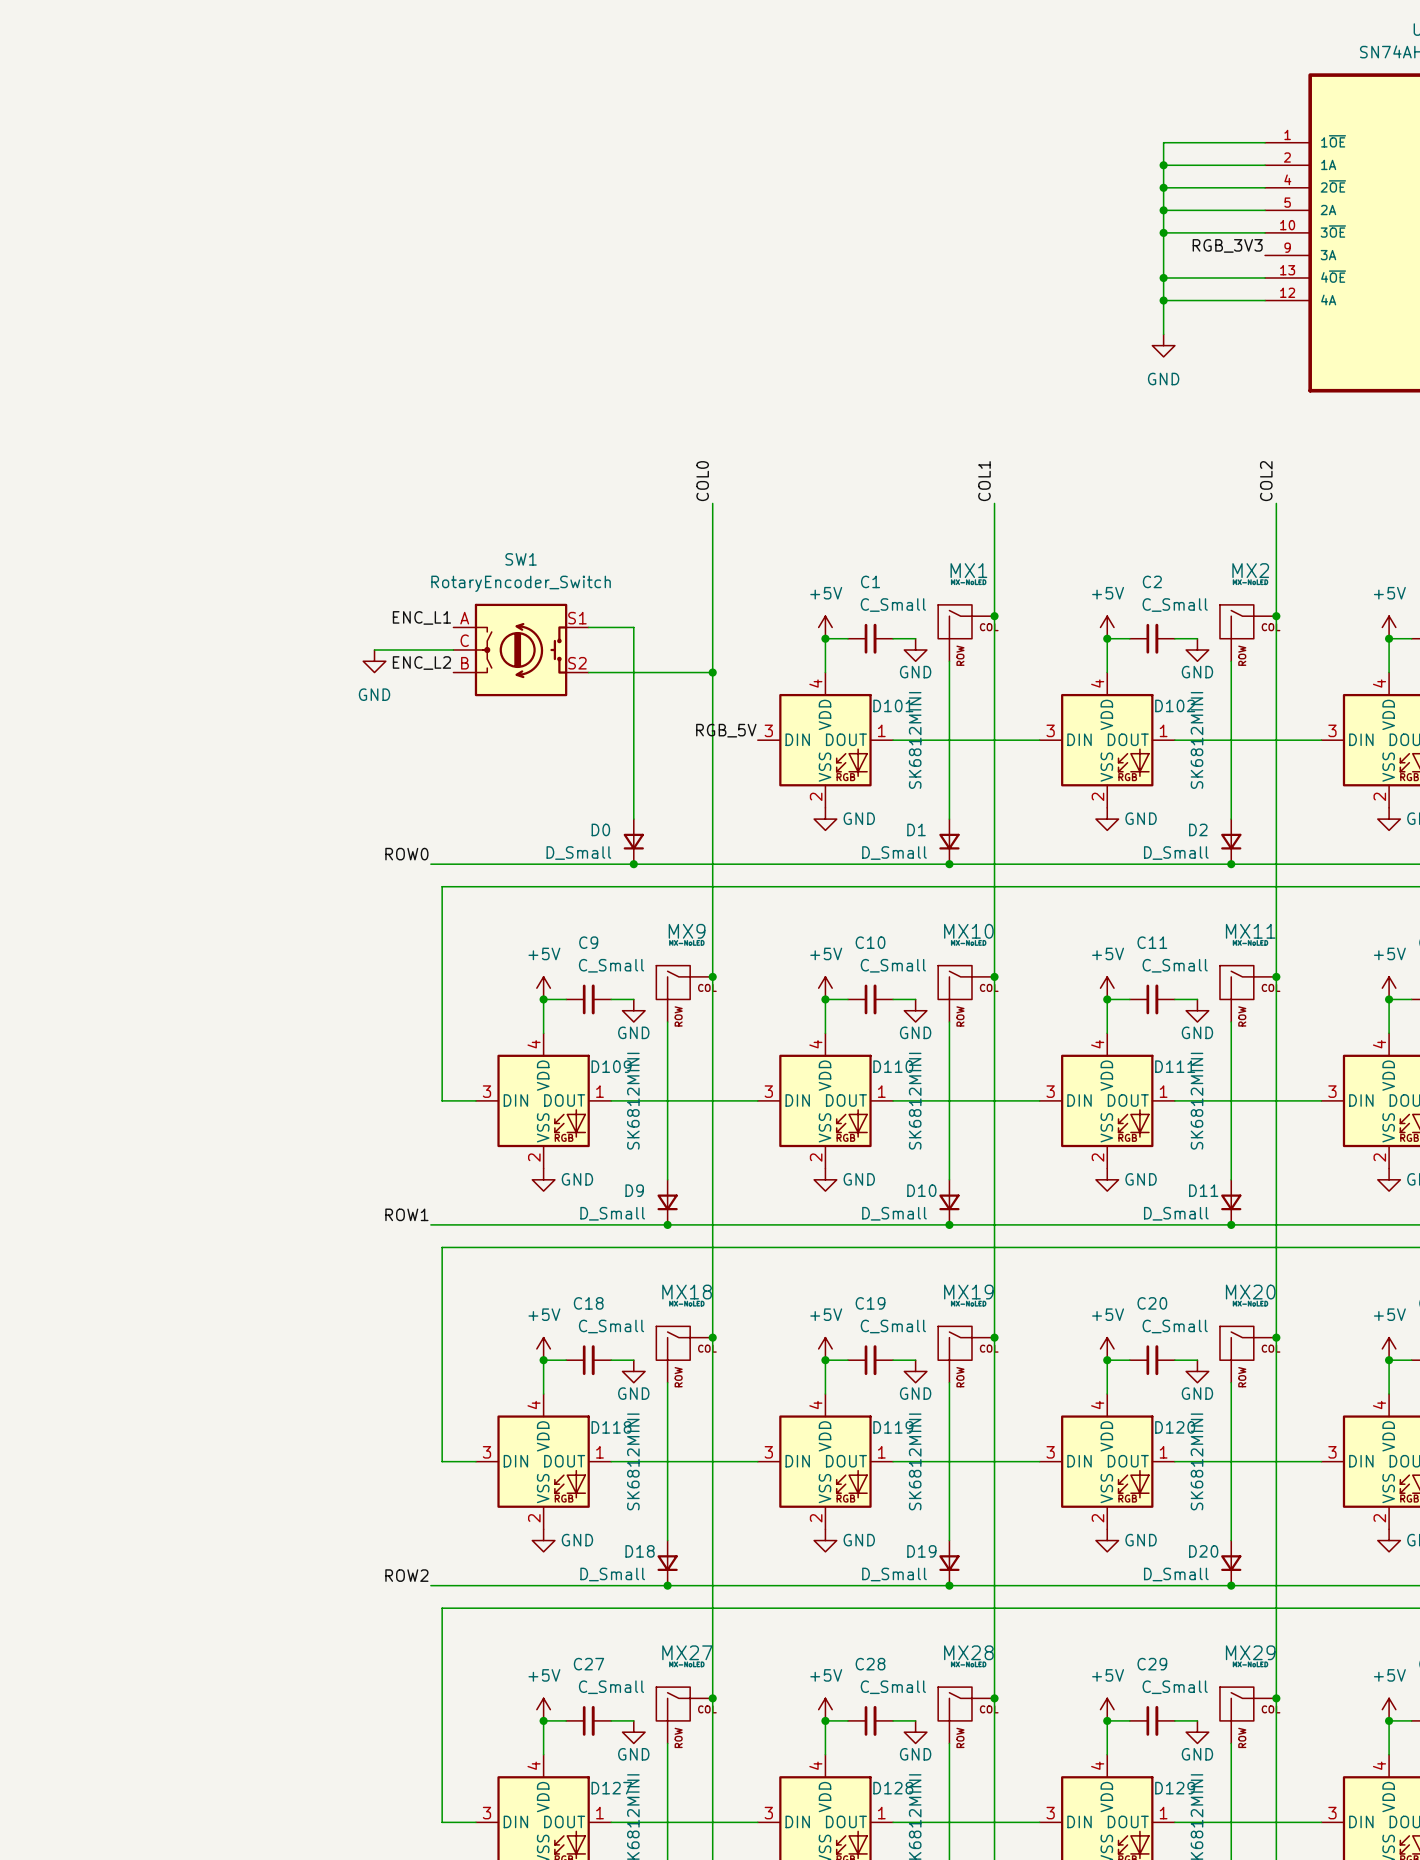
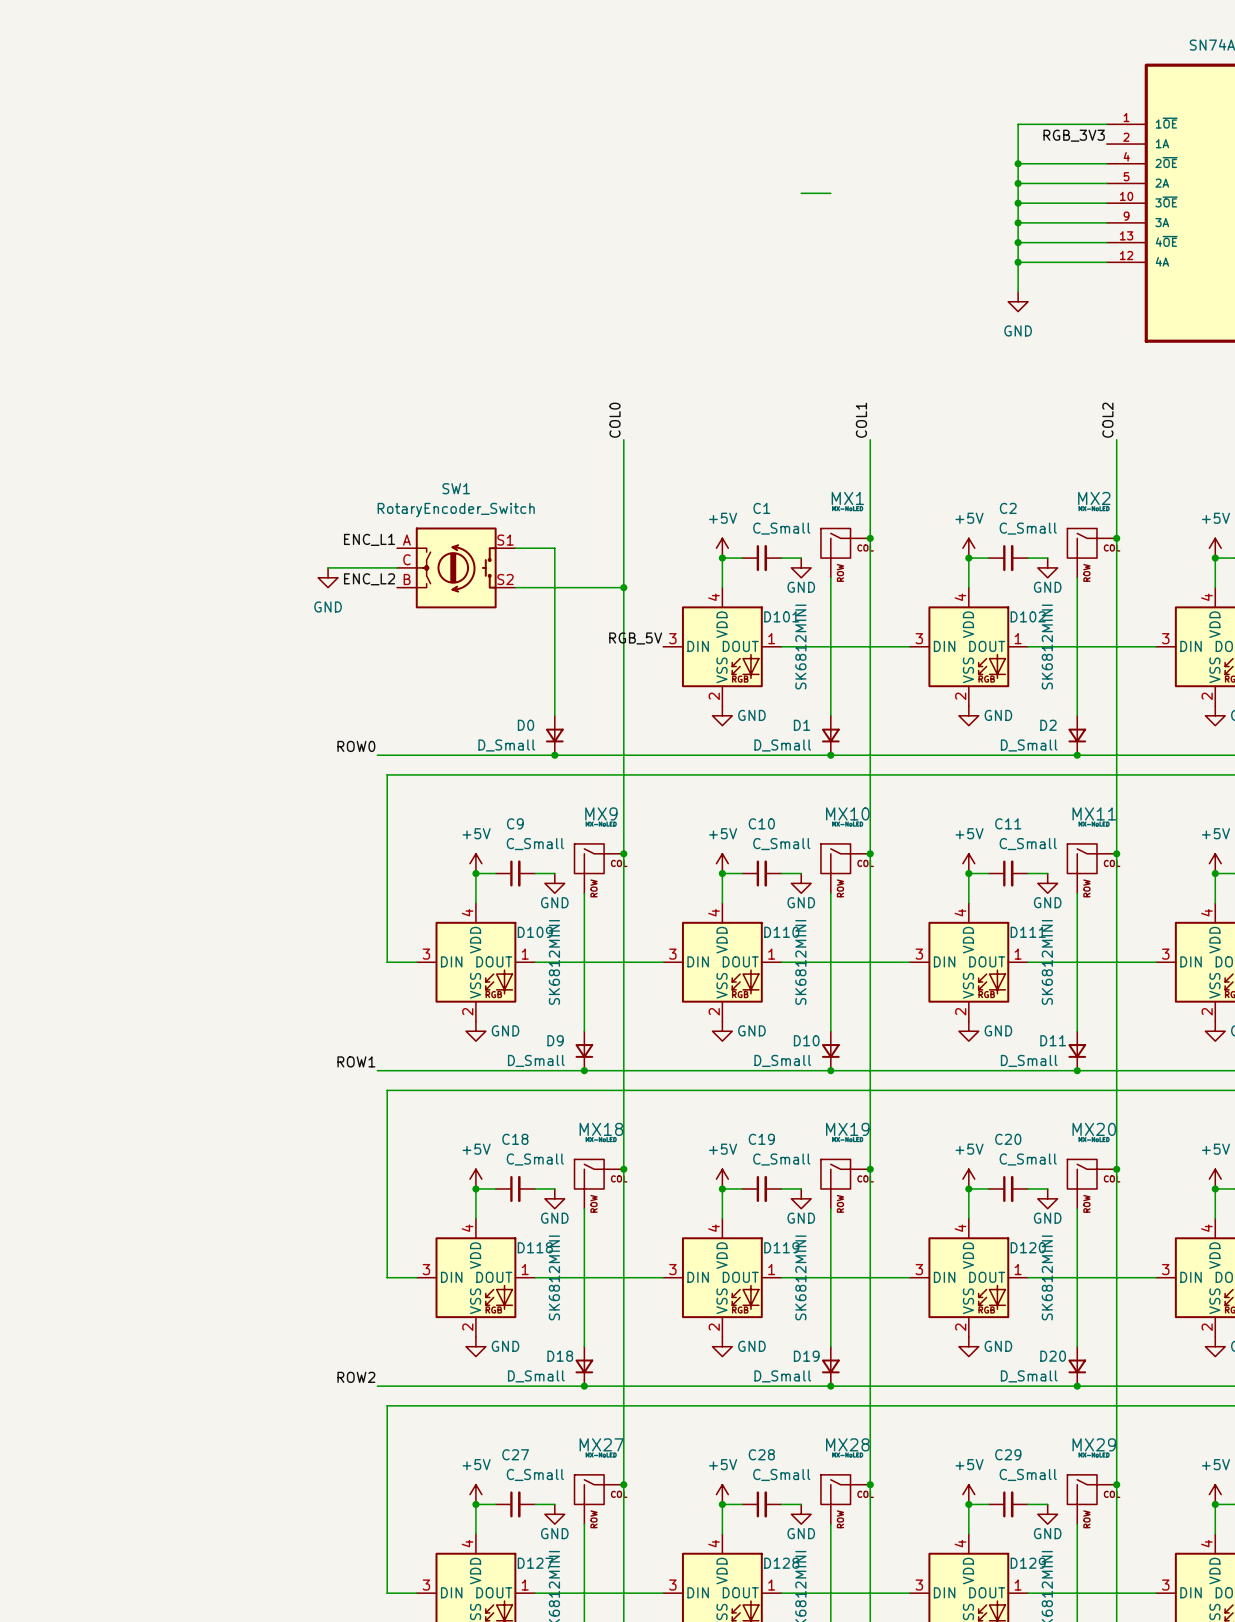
wire: (1163, 165) (1265, 165) -> (1018, 222) (1106, 222)
junction: (1163, 165) -> none
wire: none -> (801, 193) (830, 193)
label position: RGB_3V3 (1227, 245) -> RGB_3V3 (1074, 135)
junction: none -> (1018, 222)

